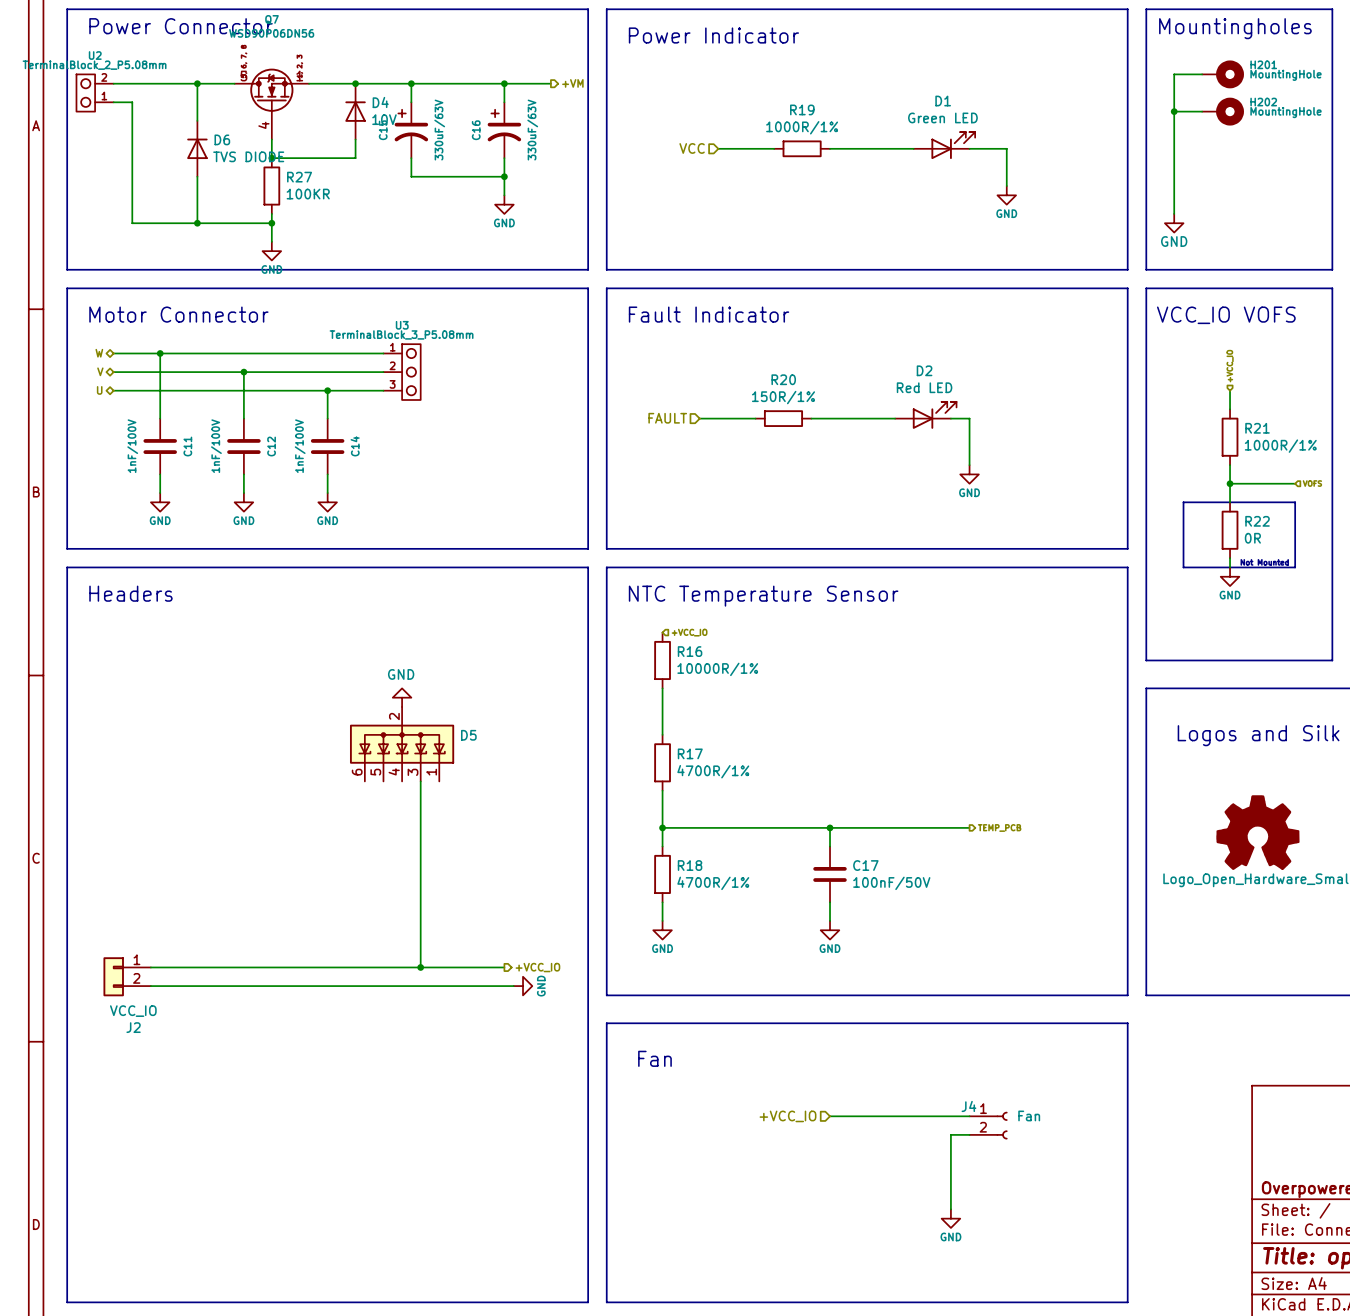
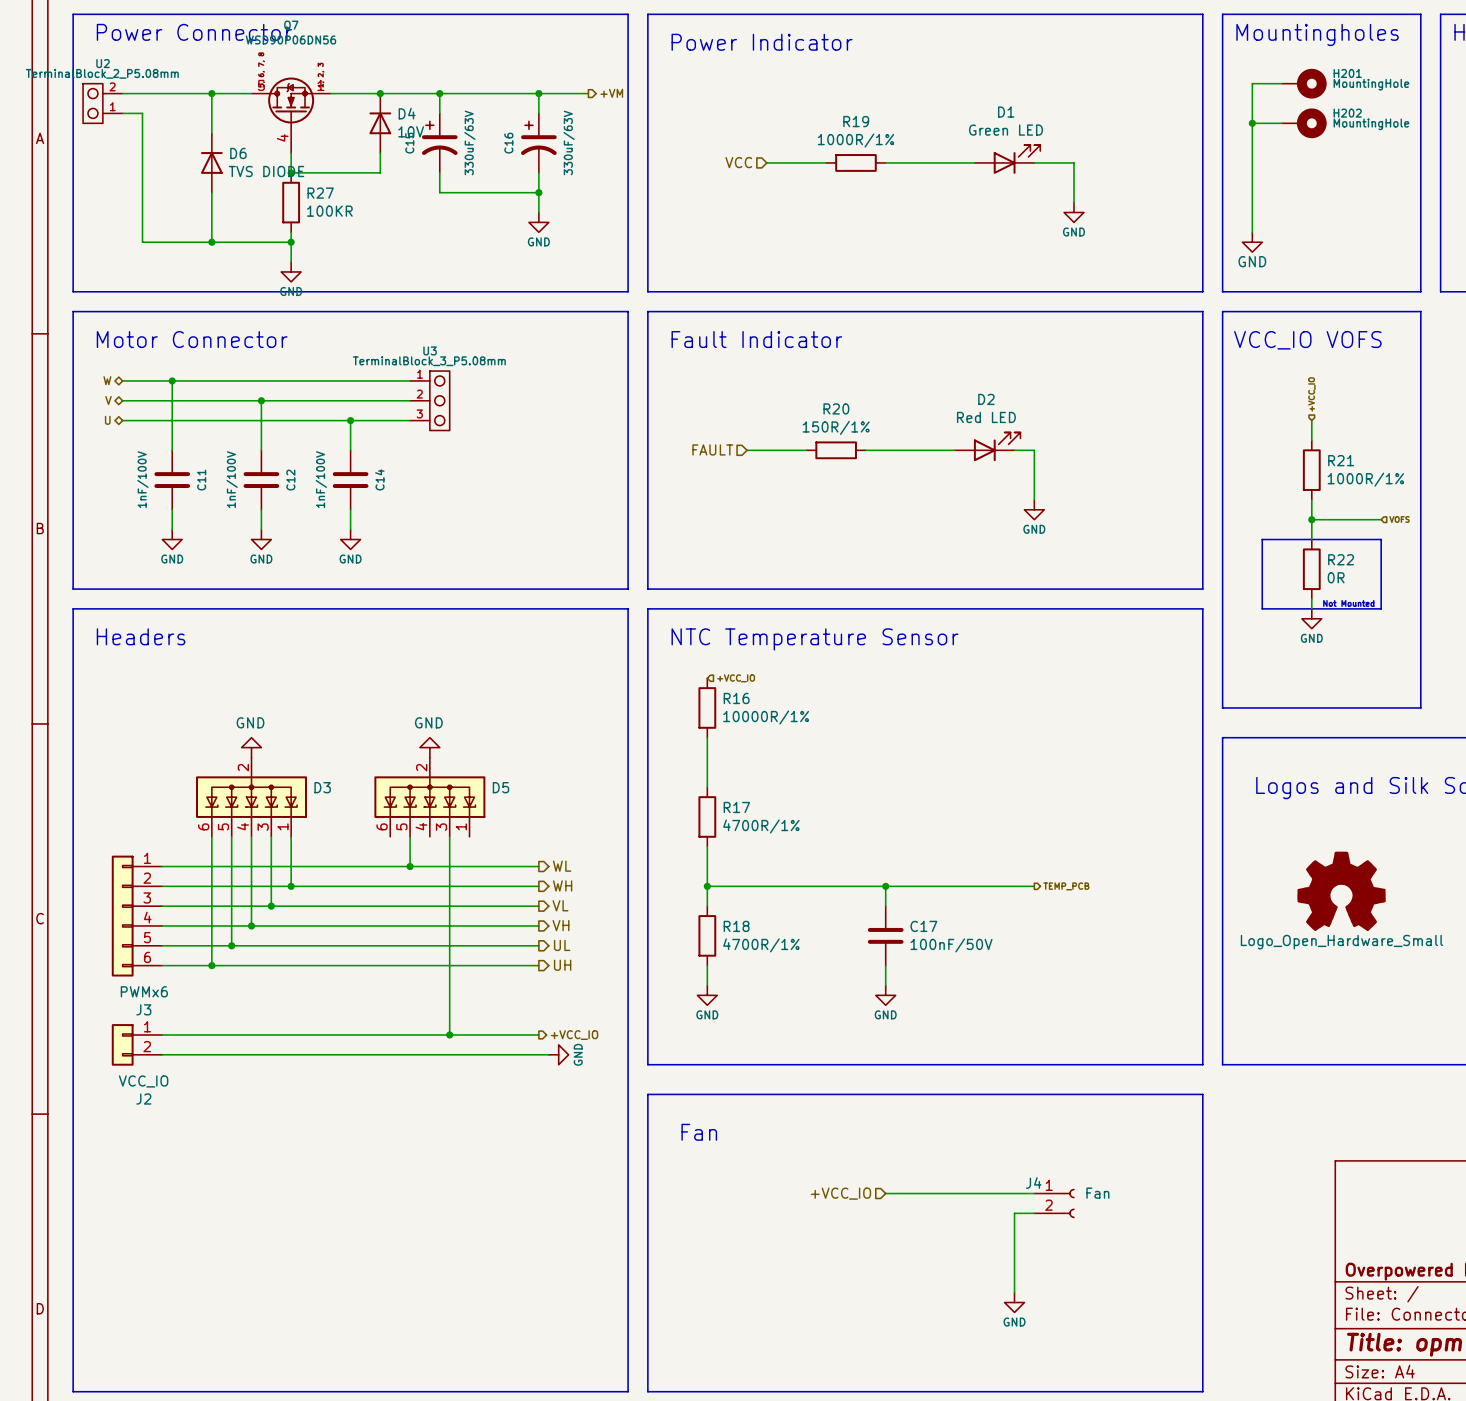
power symbol: none -> GND (251, 747)
D3: none -> (251, 797)
wire: none -> (211, 836) (211, 965)
wire: none -> (231, 836) (231, 945)
wire: none -> (251, 836) (251, 925)
wire: none -> (271, 836) (271, 906)
wire: none -> (291, 836) (291, 886)
wire: none -> (410, 836) (410, 866)
hierarchical label: none -> WL (562, 866)
wire: none -> (162, 866) (538, 866)
junction: none -> (410, 866)
wire: none -> (162, 886) (538, 886)
junction: none -> (291, 886)
hierarchical label: none -> WH (562, 885)
wire: none -> (162, 906) (538, 906)
junction: none -> (271, 906)
hierarchical label: none -> VL (560, 905)
J3: none -> PWMx6 (137, 916)
hierarchical label: none -> VH (560, 925)
wire: none -> (162, 925) (538, 925)
junction: none -> (251, 925)
wire: none -> (162, 945) (538, 945)
junction: none -> (231, 945)
hierarchical label: none -> UL (562, 945)
wire: none -> (162, 965) (538, 965)
junction: none -> (211, 965)
hierarchical label: none -> UH (562, 965)

